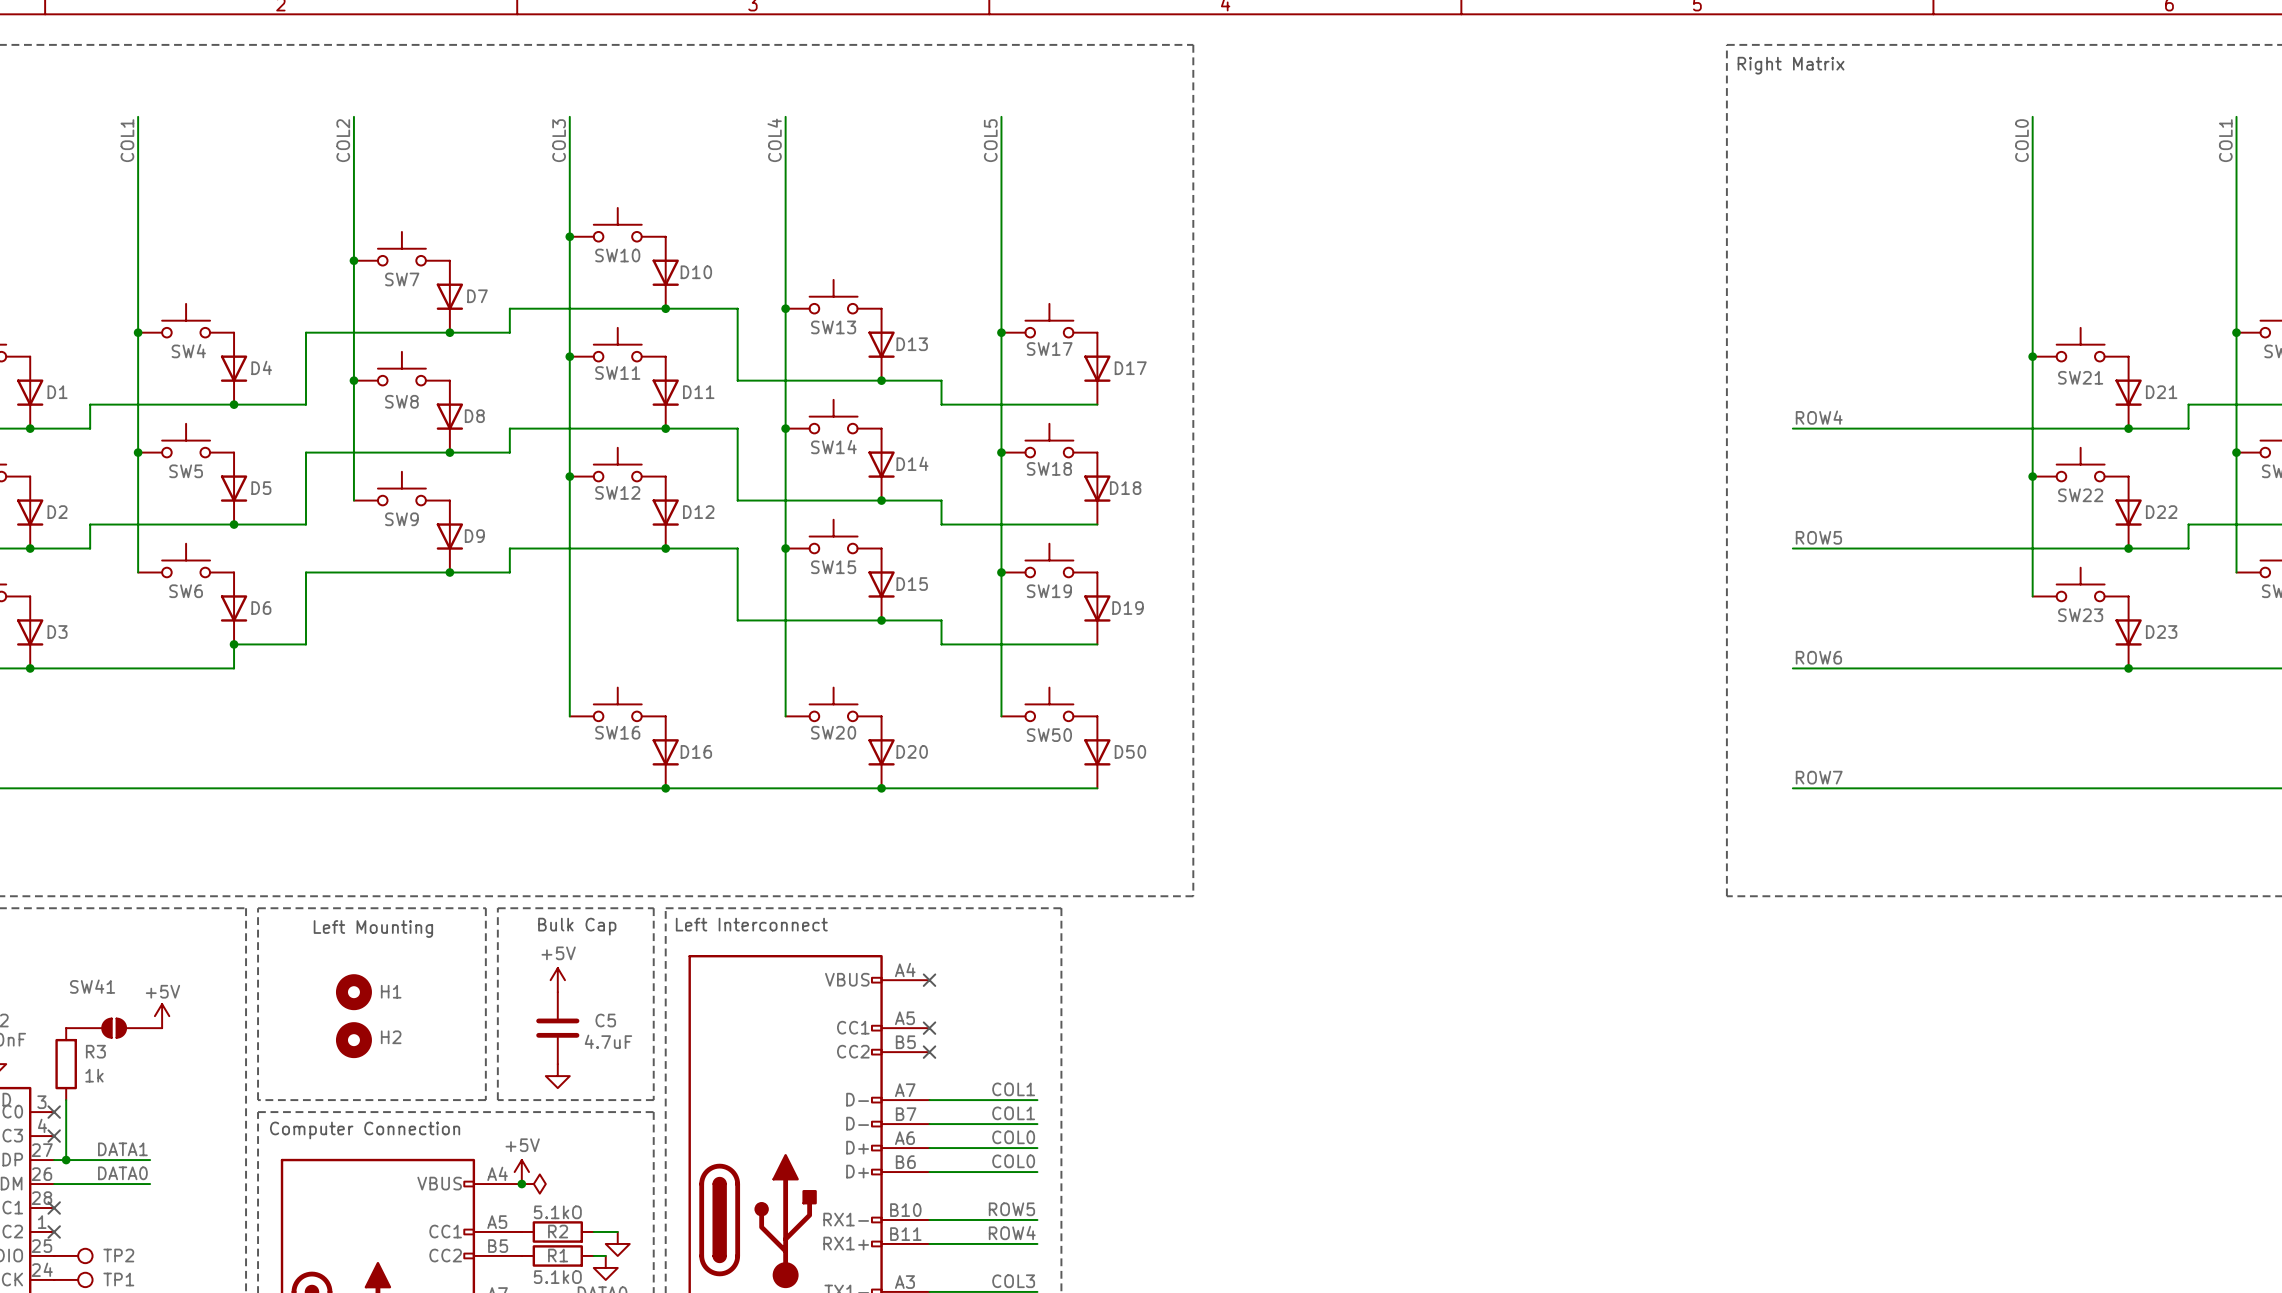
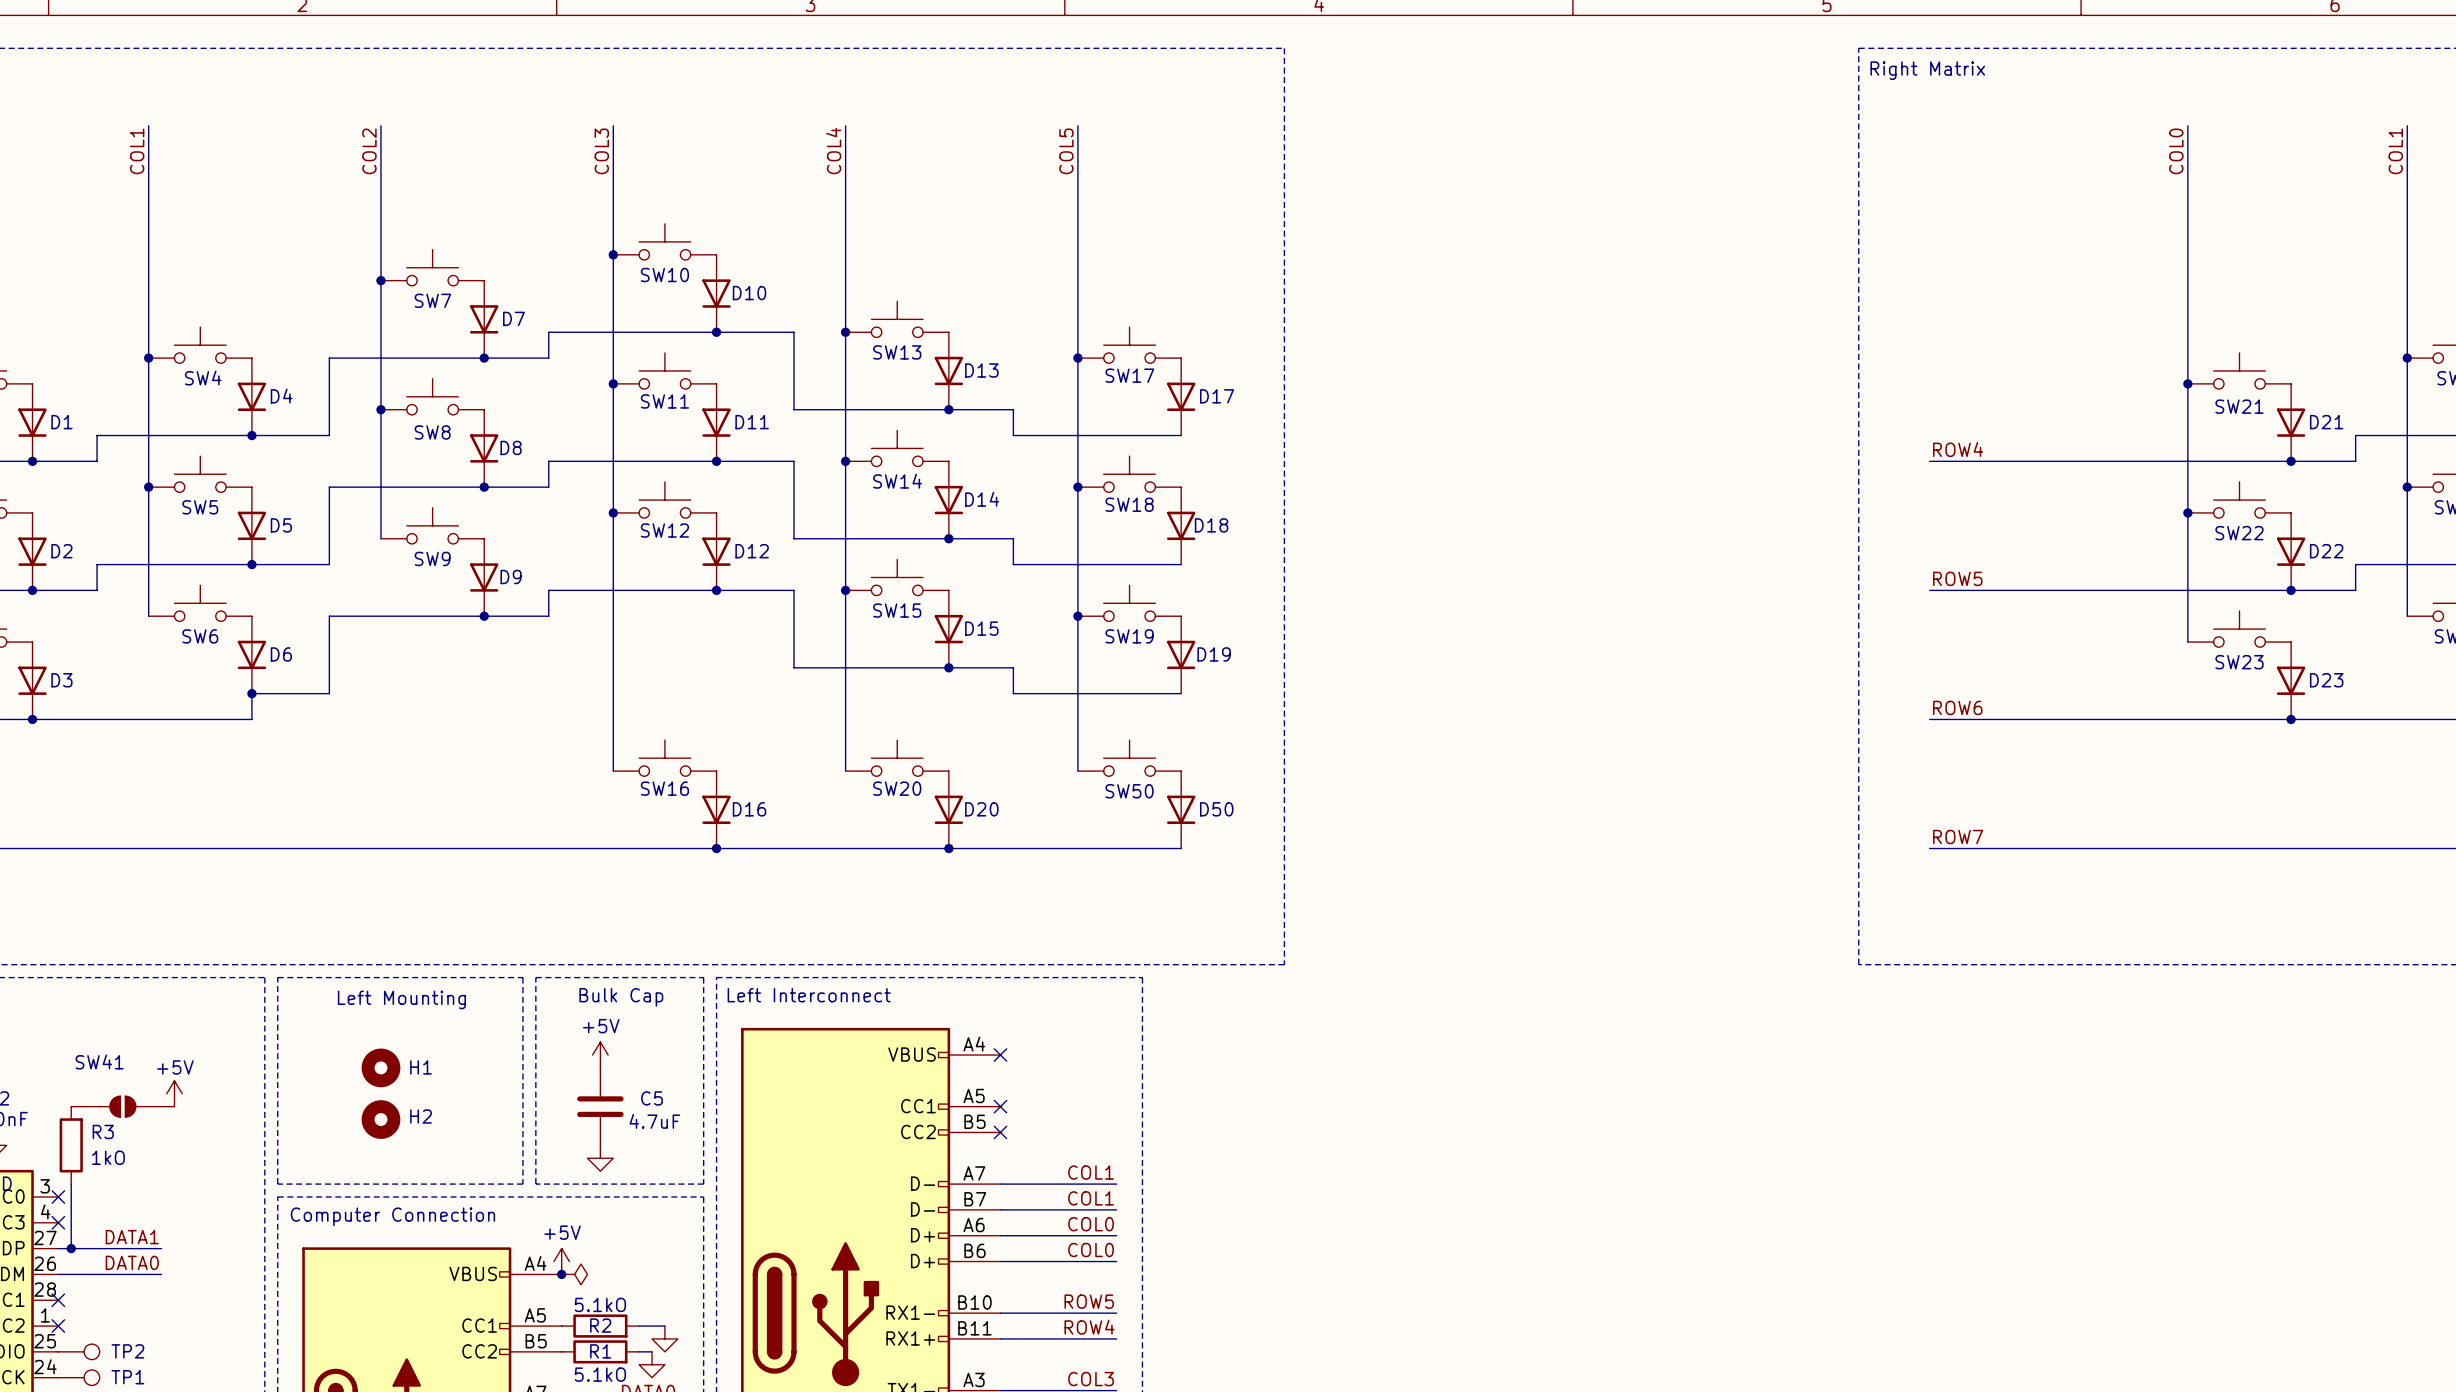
R3 value: 1k (94, 1075) -> 1kO (108, 1157)

